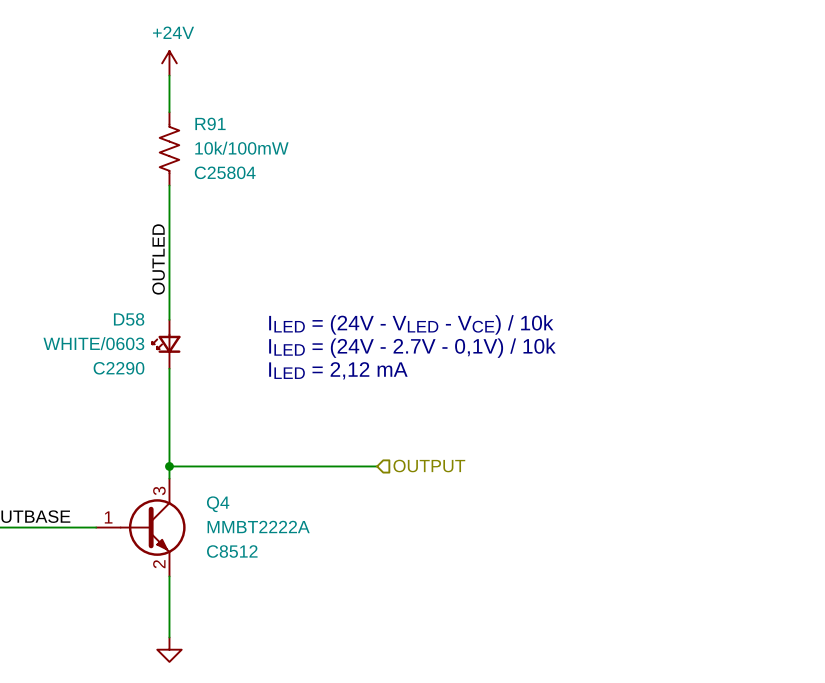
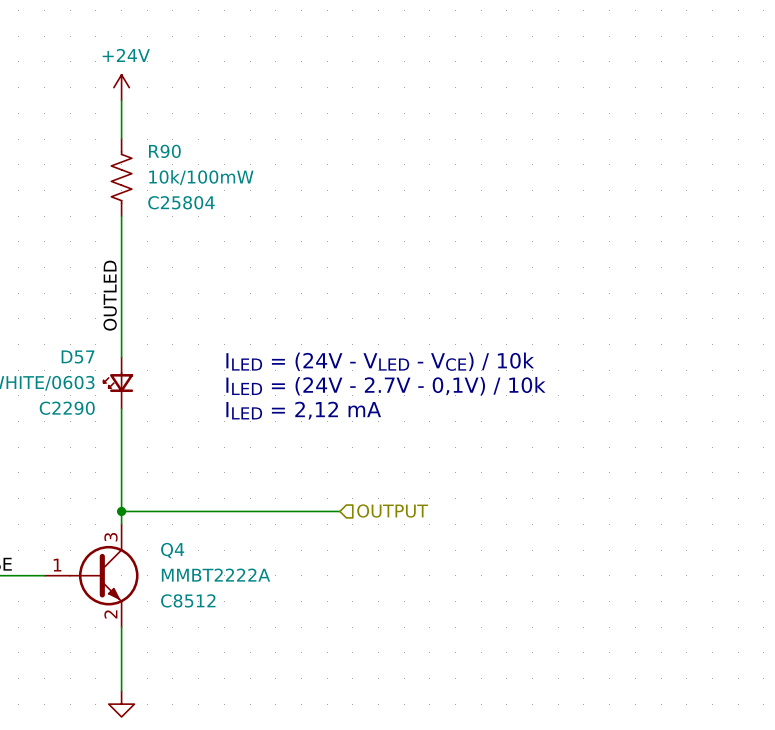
R91 name: R91 (210, 123) -> R90 (164, 151)
D58 name: D58 (129, 319) -> D57 (78, 356)

